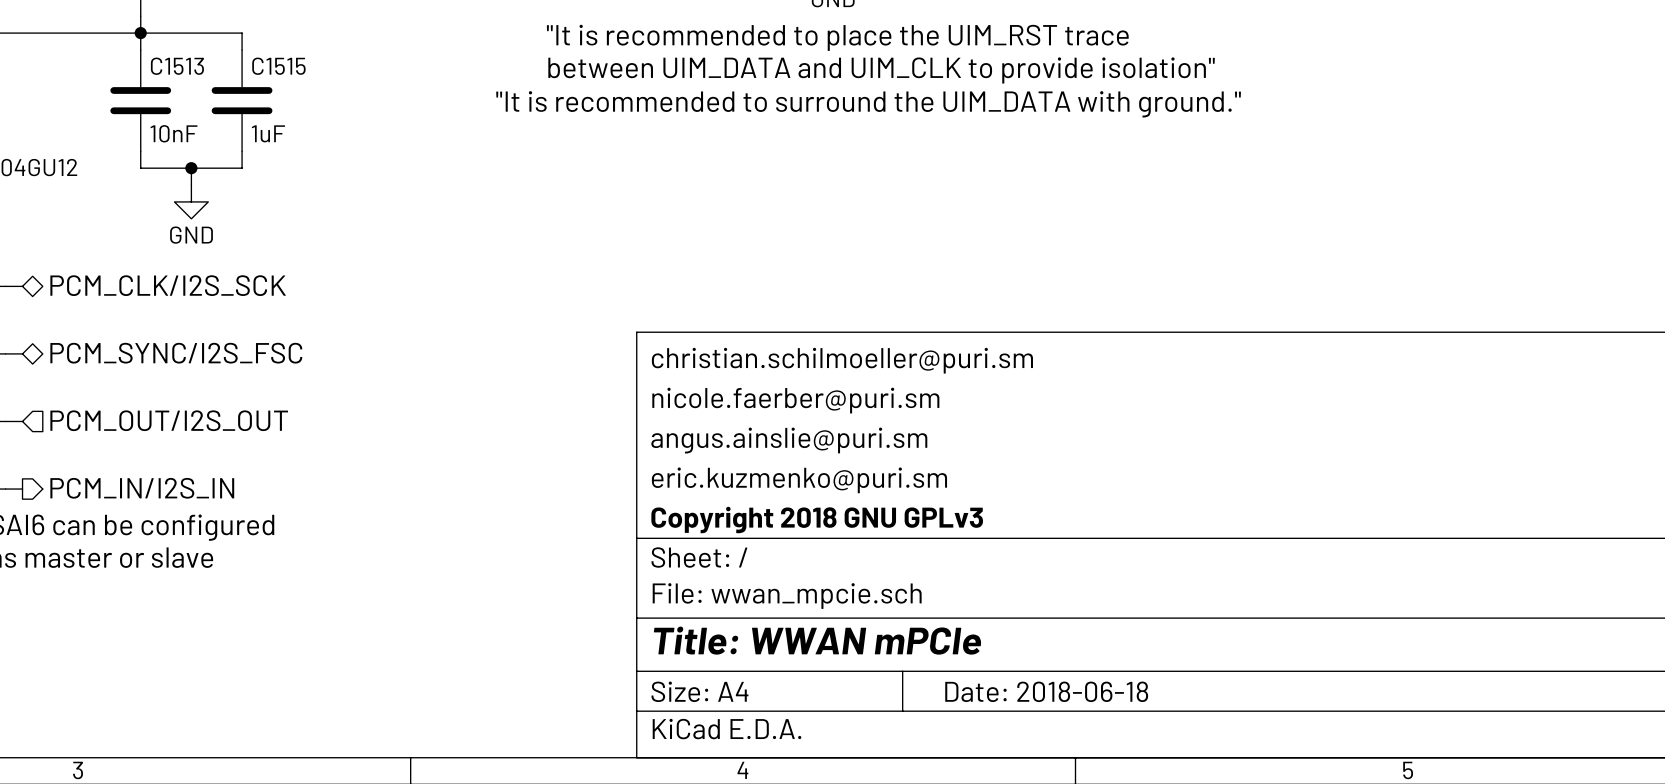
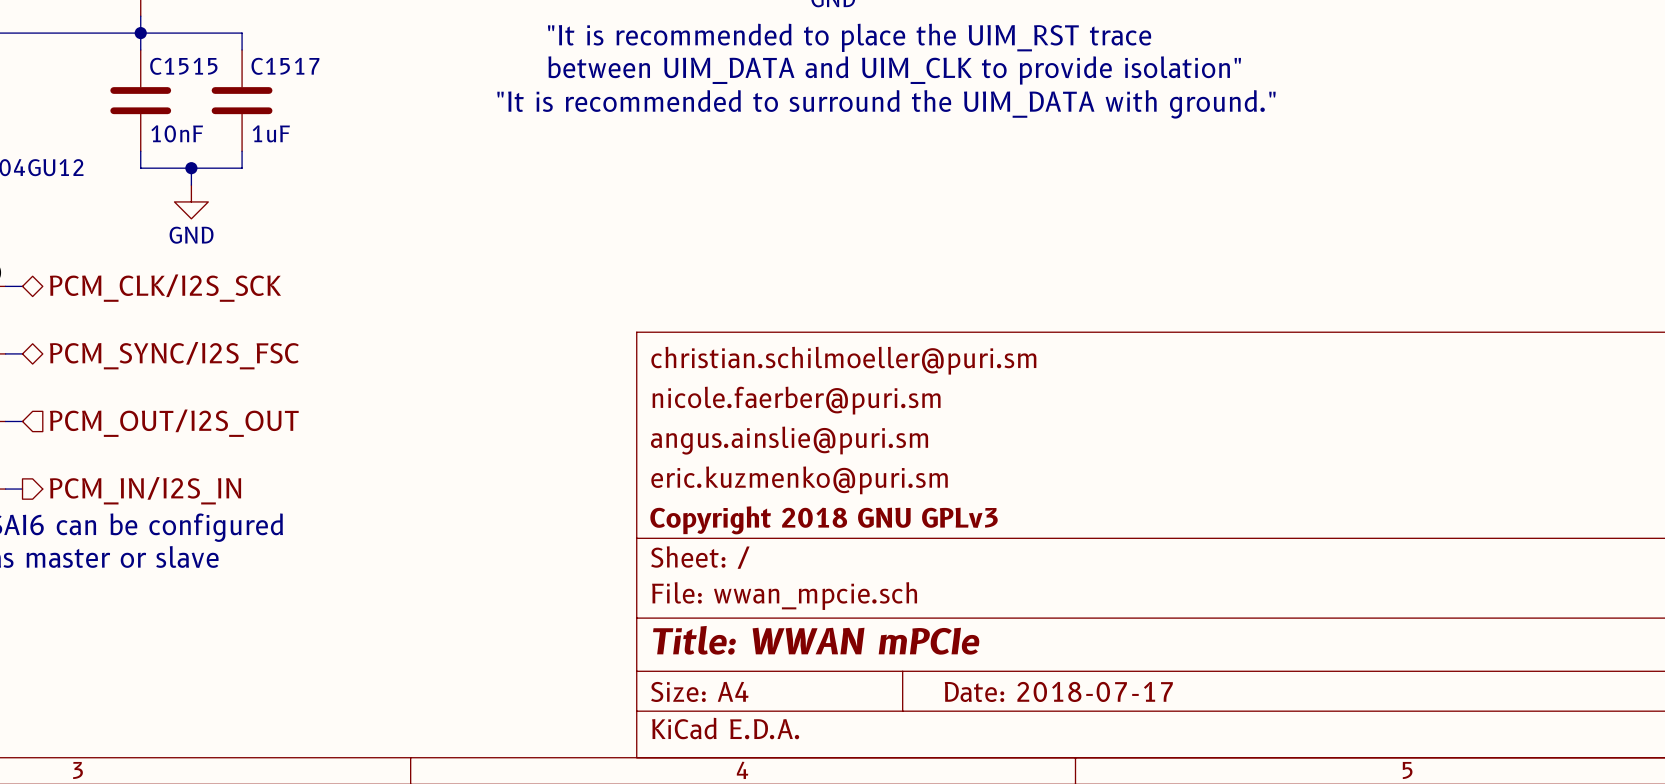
C1513 name: C1513 (177, 66) -> C1515 (183, 66)
C1515 name: C1515 (278, 66) -> C1517 (285, 66)
title block: Date: 2018-06-18 (1046, 691) -> Date: 2018-07-17 (1058, 691)

